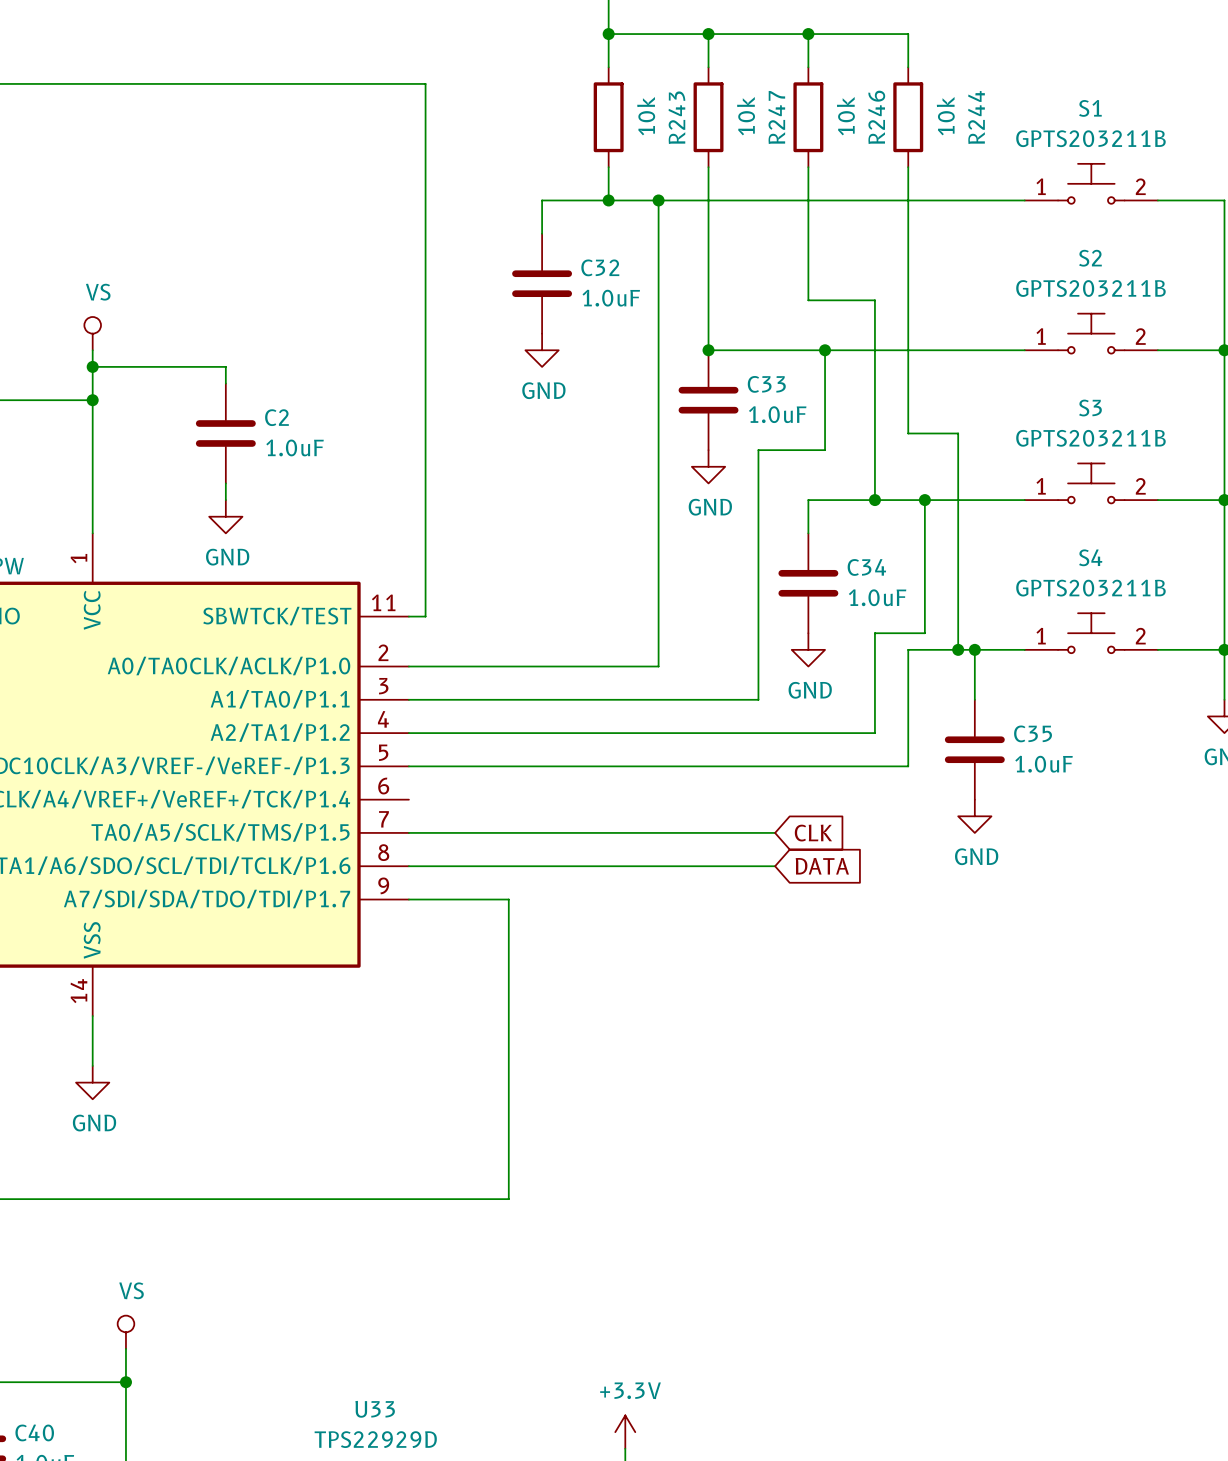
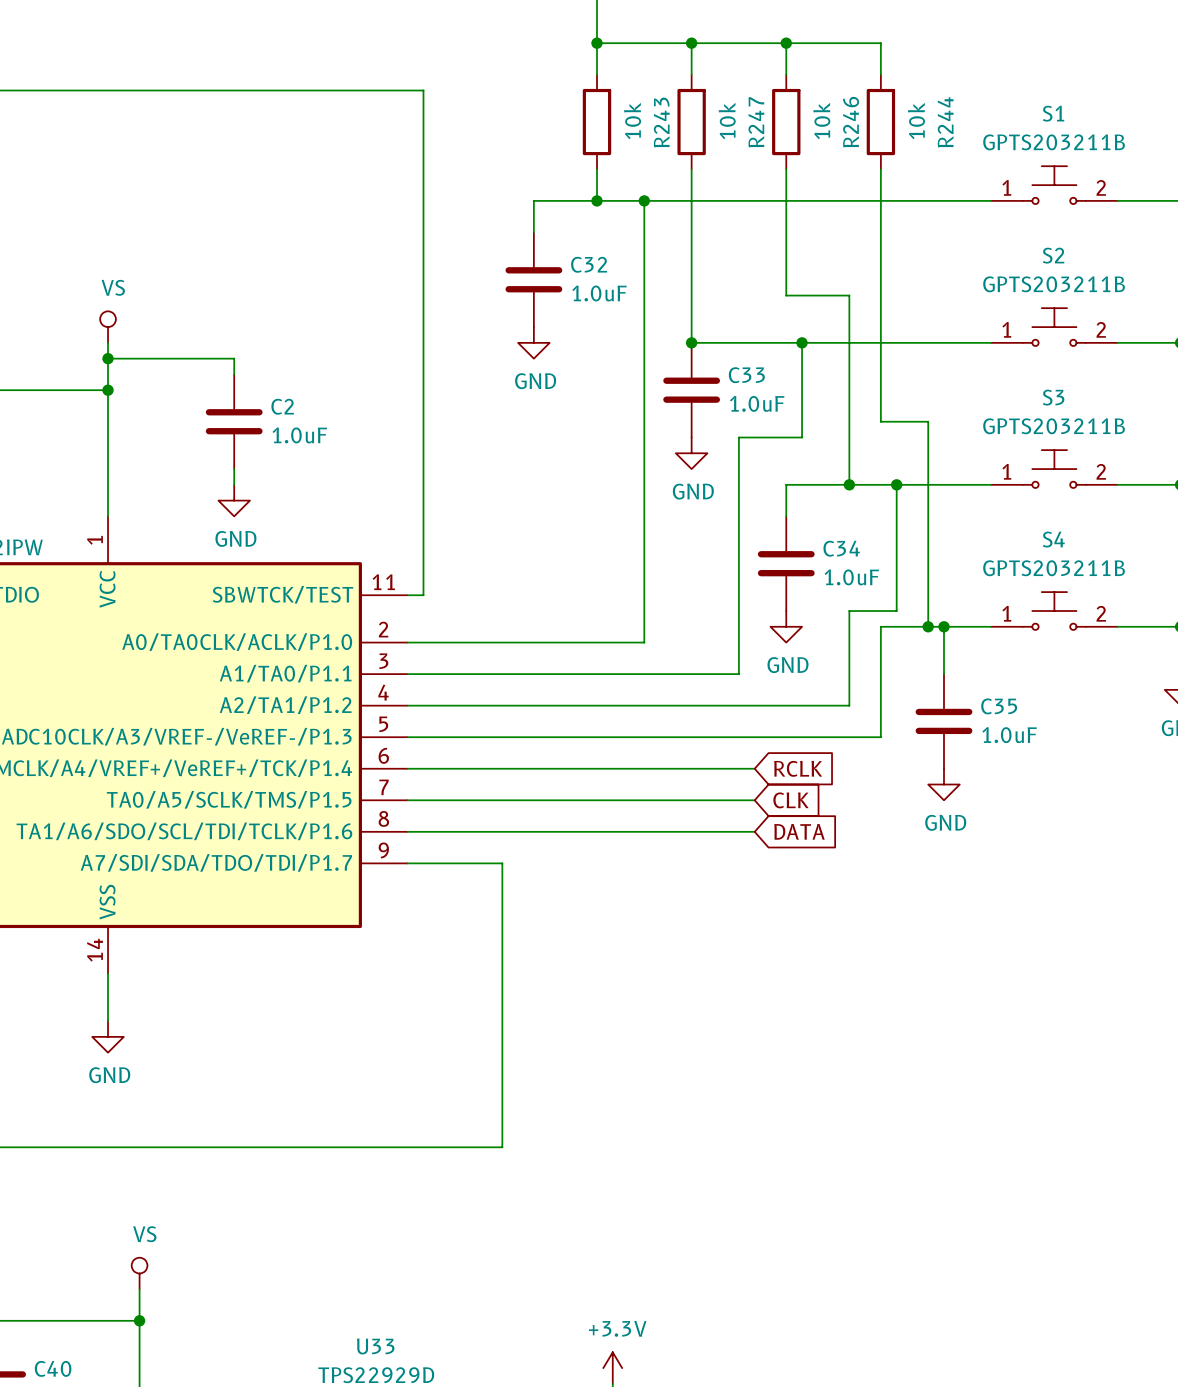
wire: none -> (407, 768) (754, 768)
global label: none -> RCLK (798, 768)

